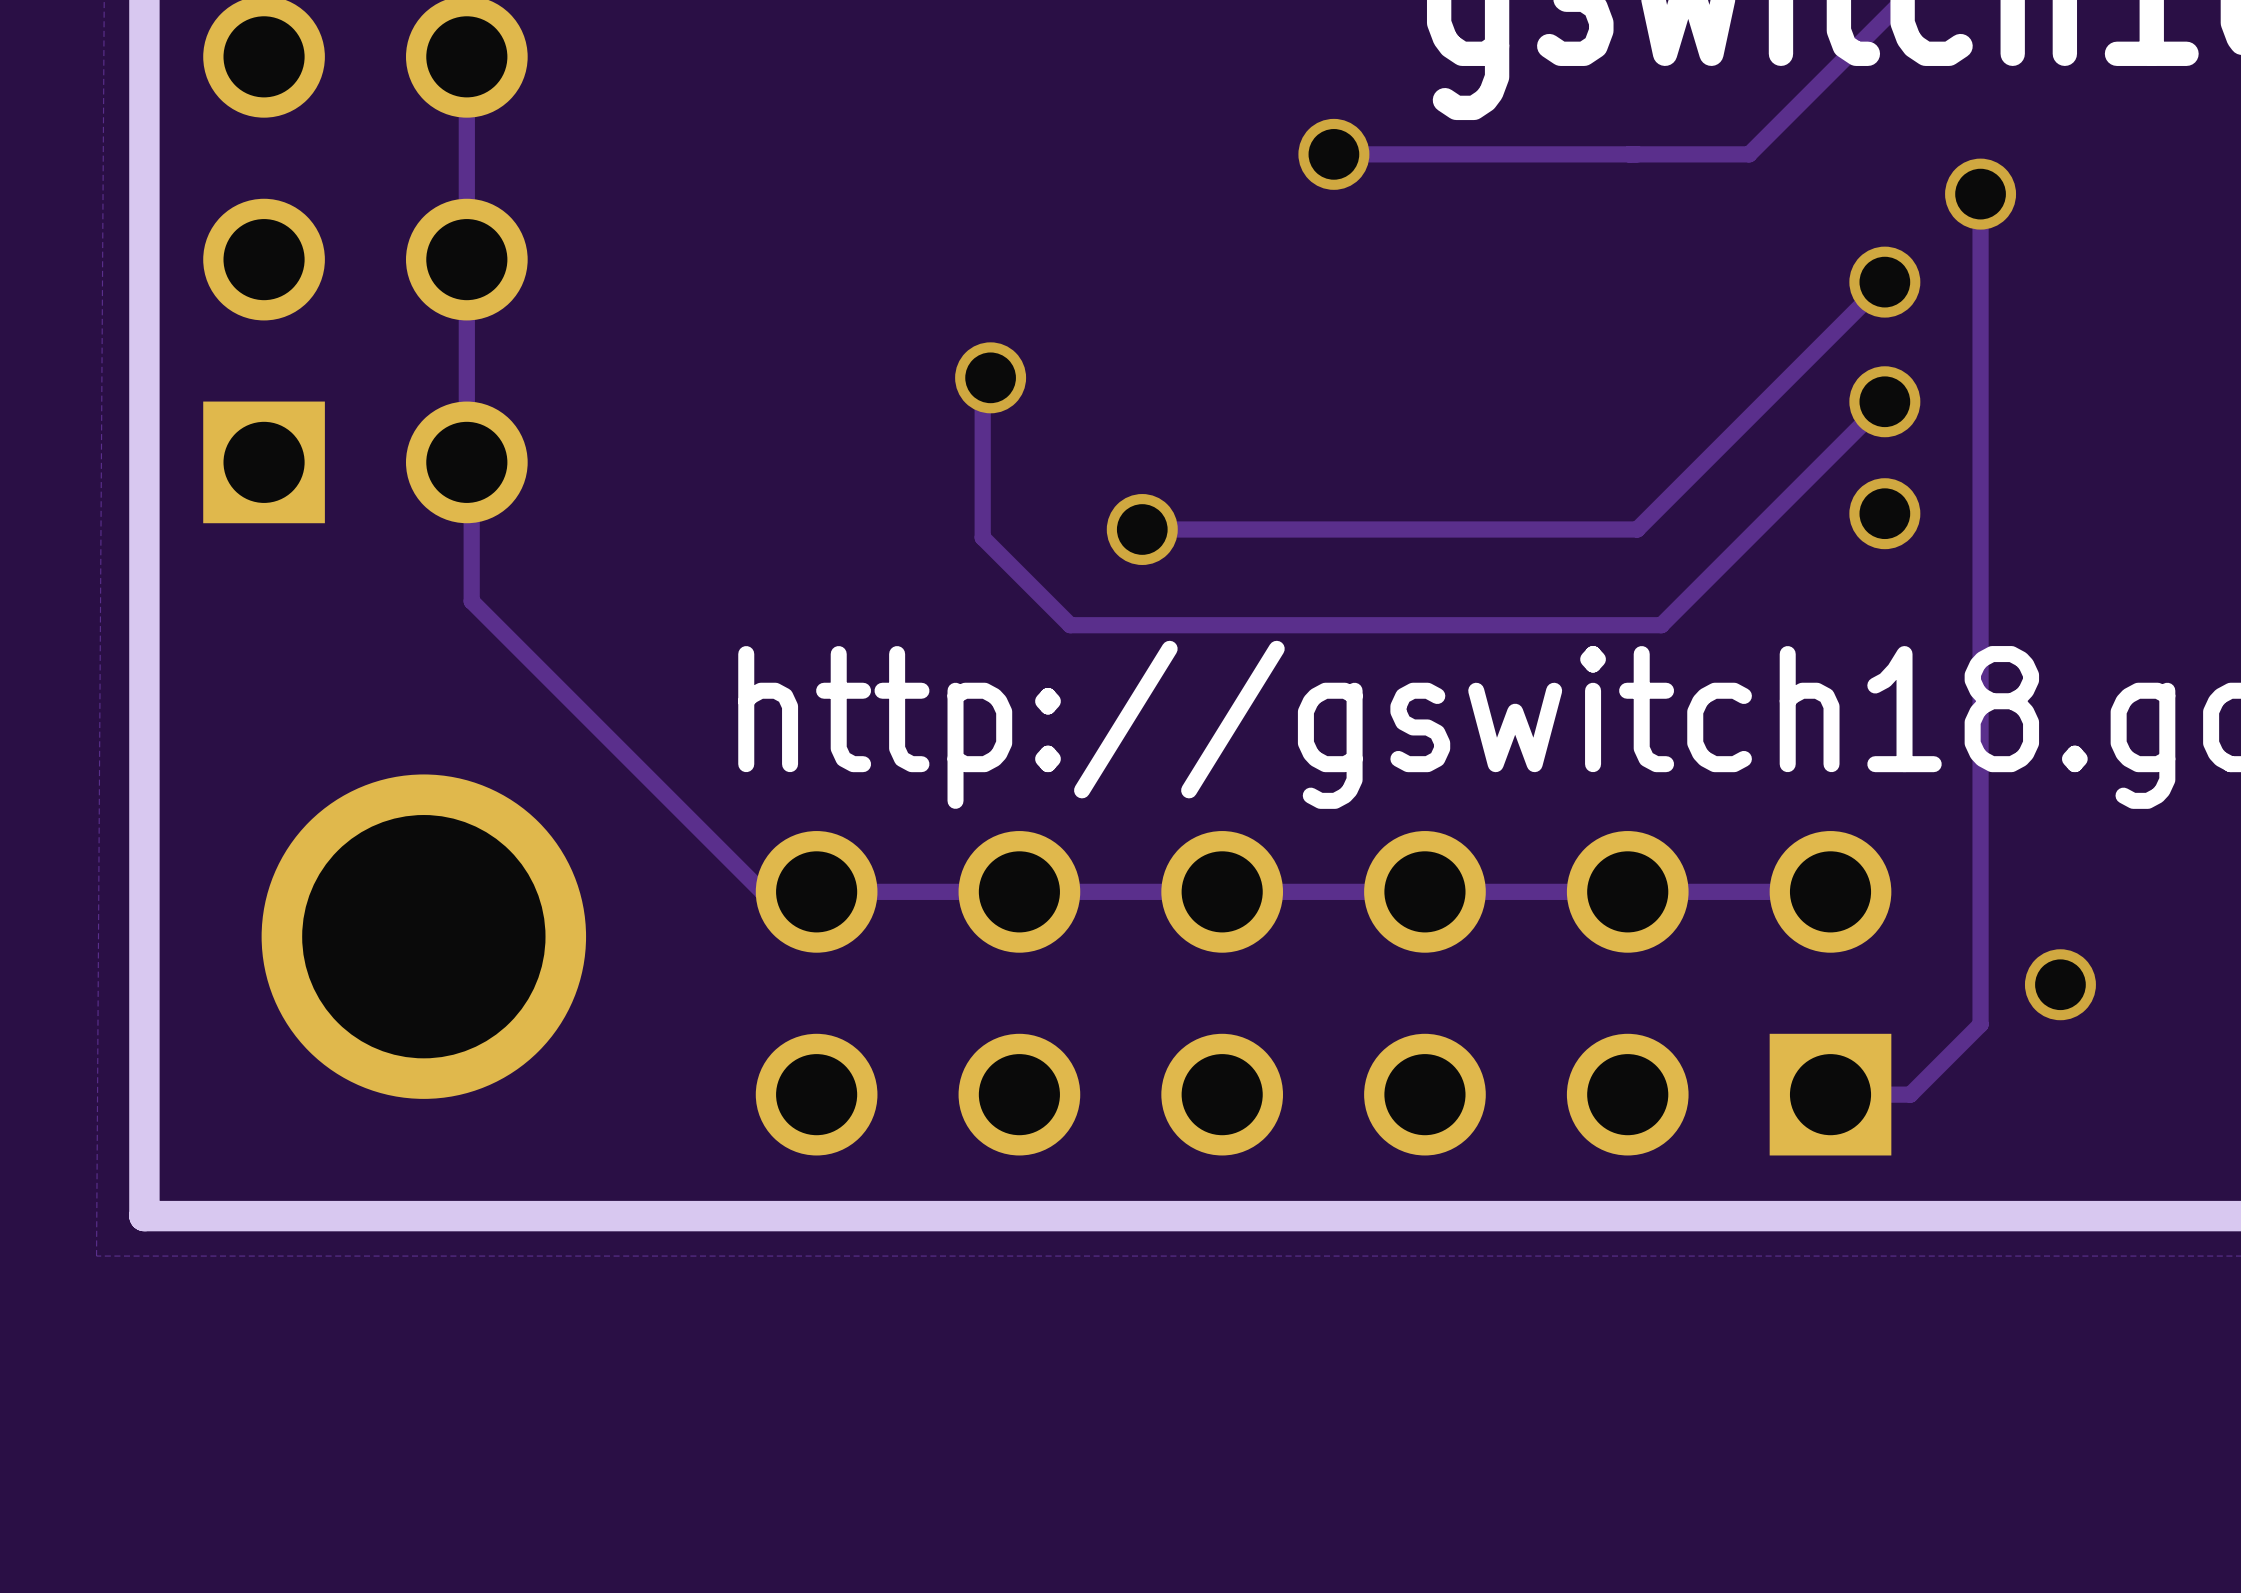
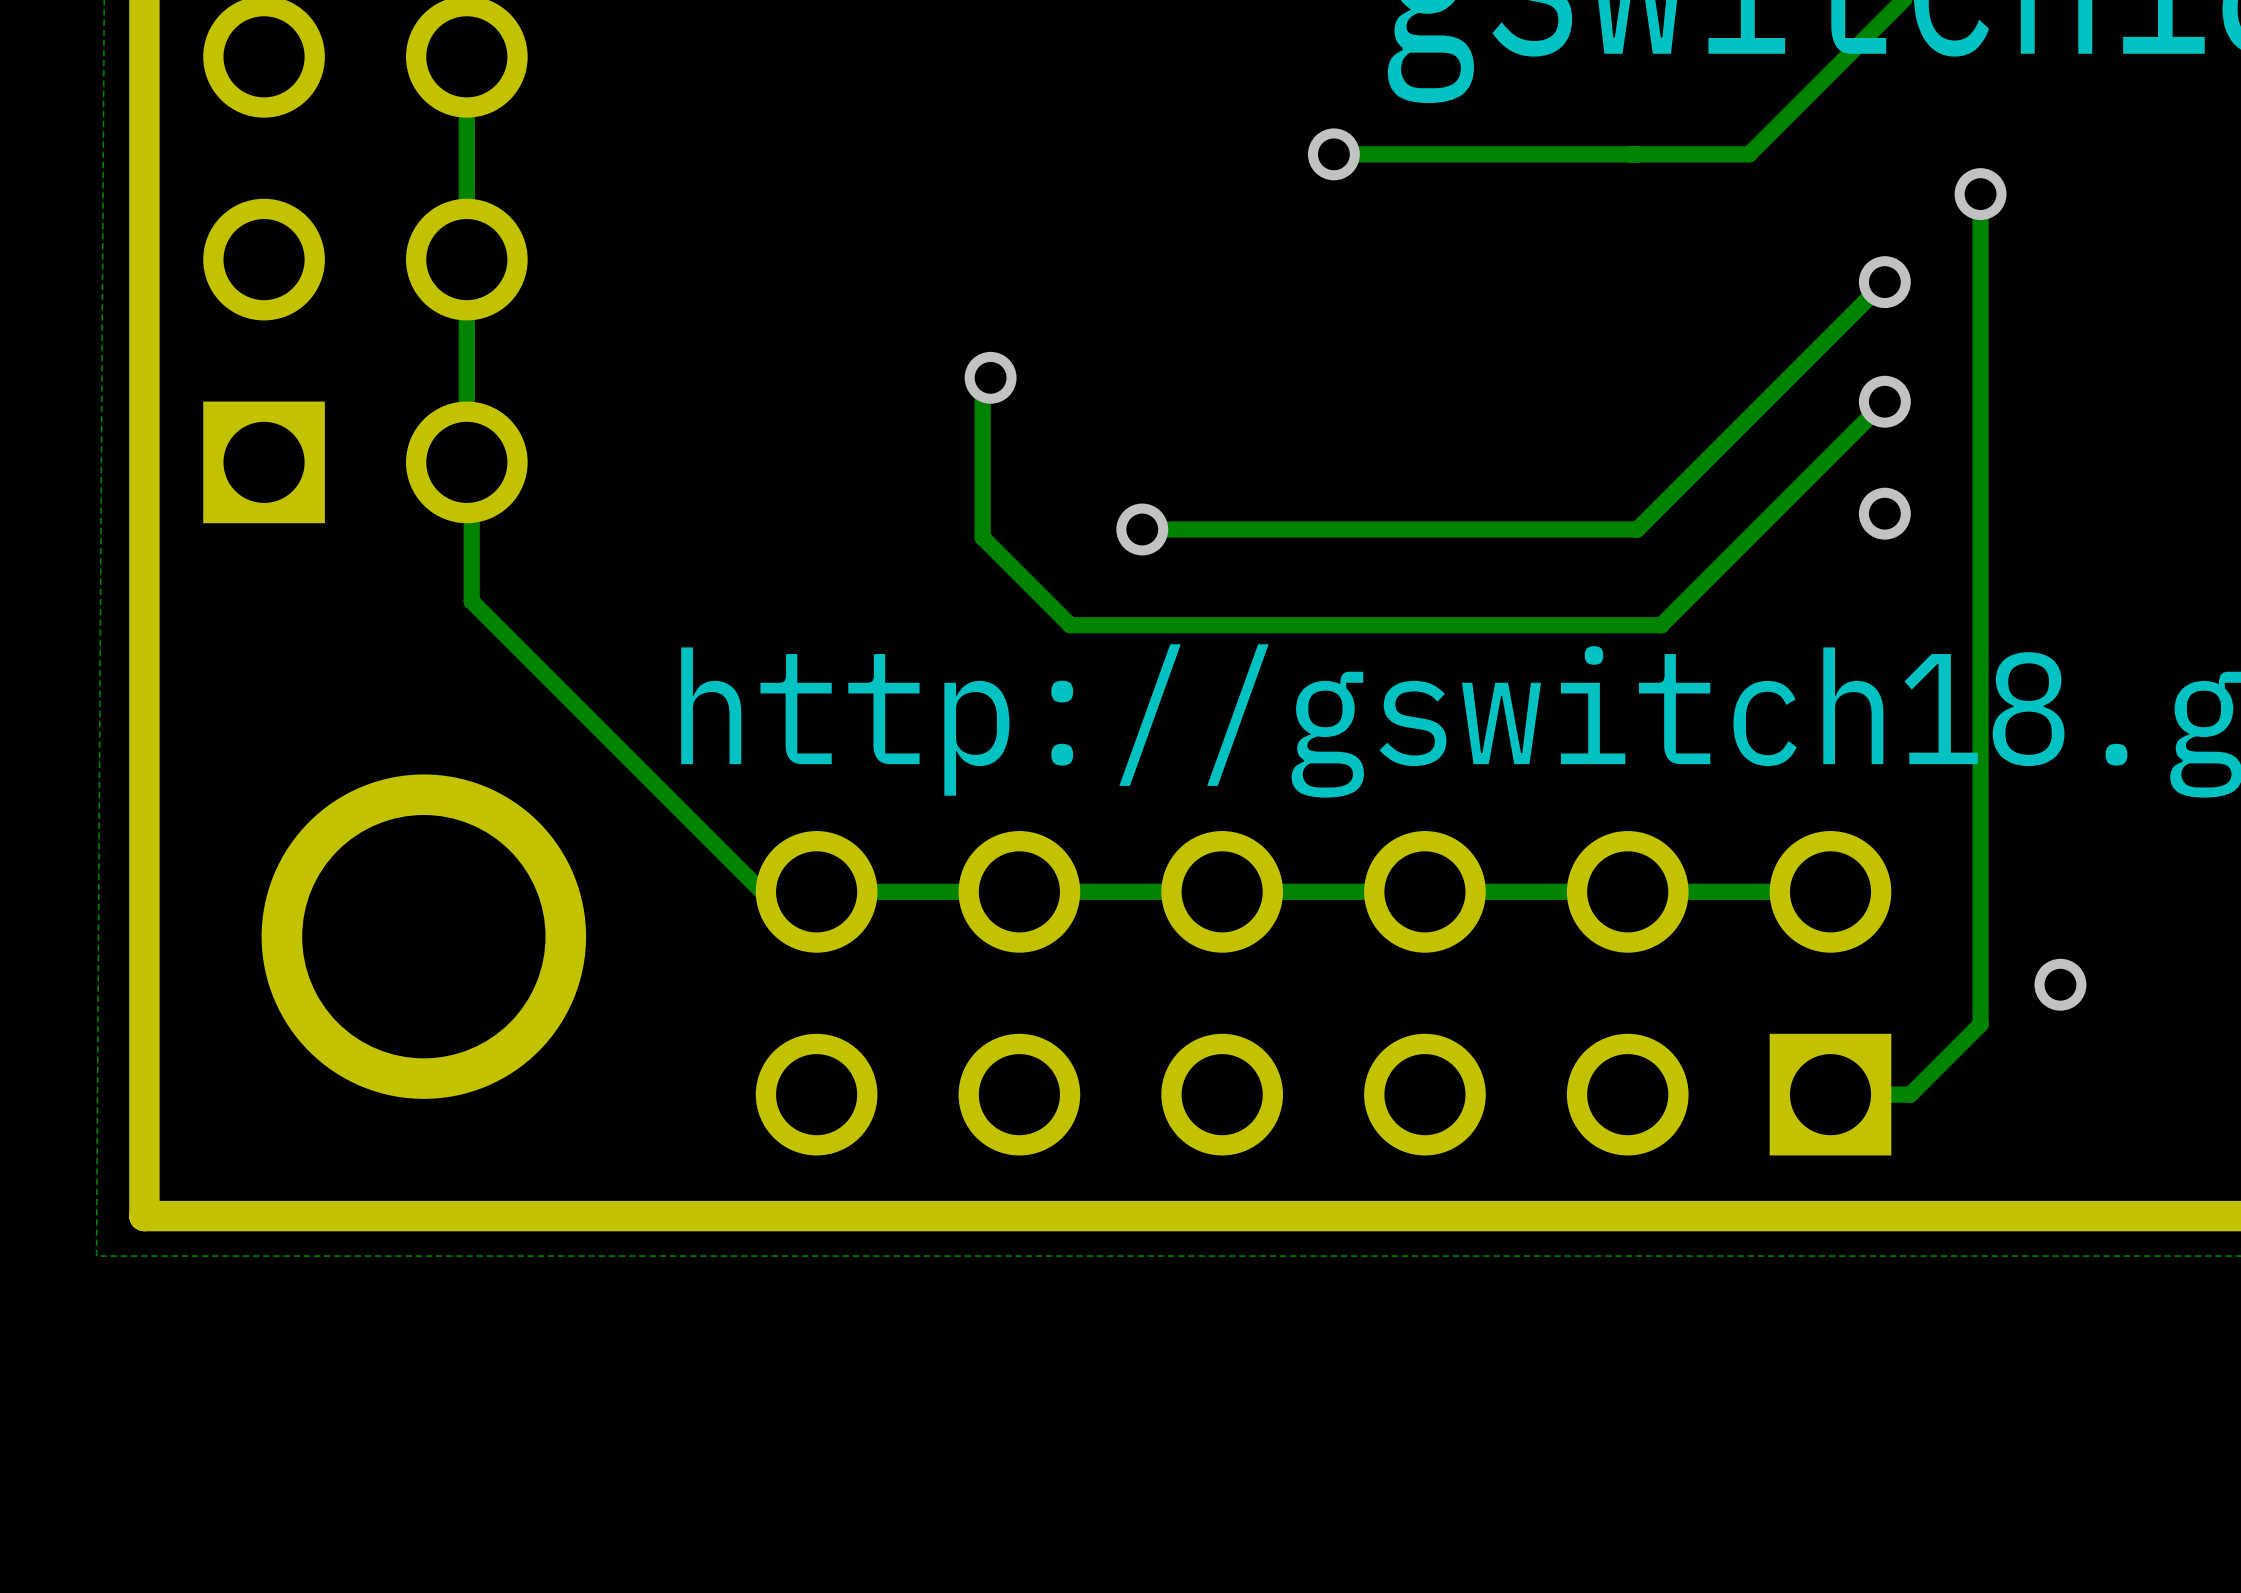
via size: [1298, 118, 1370, 190] -> [1307, 128, 1360, 181]
via size: [1945, 158, 2017, 230] -> [1954, 168, 2007, 221]
via size: [1849, 246, 1921, 318] -> [1858, 256, 1911, 309]
via size: [955, 342, 1027, 414] -> [964, 351, 1017, 404]
via size: [1849, 366, 1921, 438] -> [1858, 375, 1911, 428]
via size: [1849, 478, 1921, 550] -> [1858, 487, 1911, 540]
via size: [1106, 494, 1178, 565] -> [1116, 503, 1169, 556]
via size: [2024, 949, 2096, 1021] -> [2034, 958, 2087, 1011]

